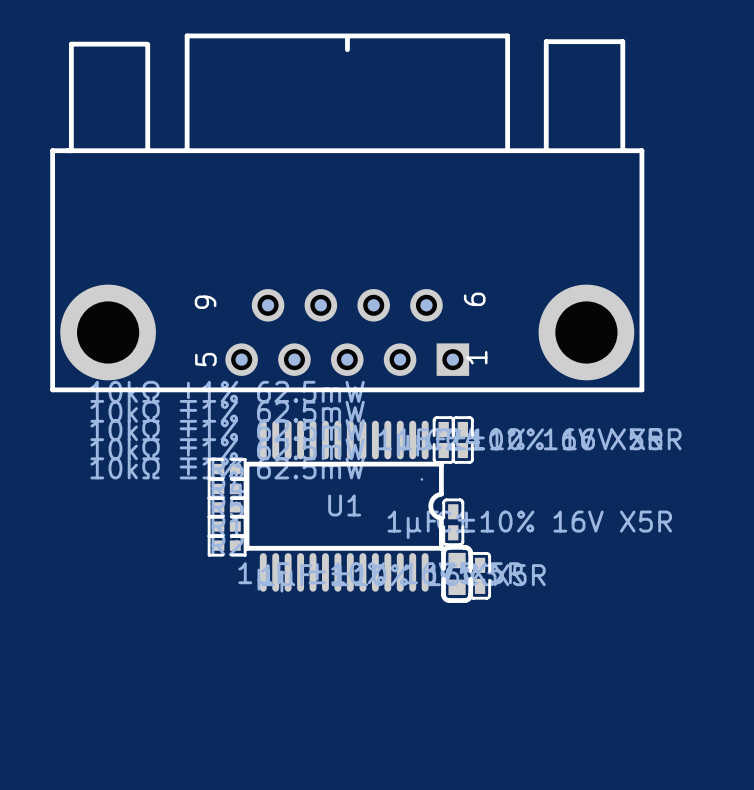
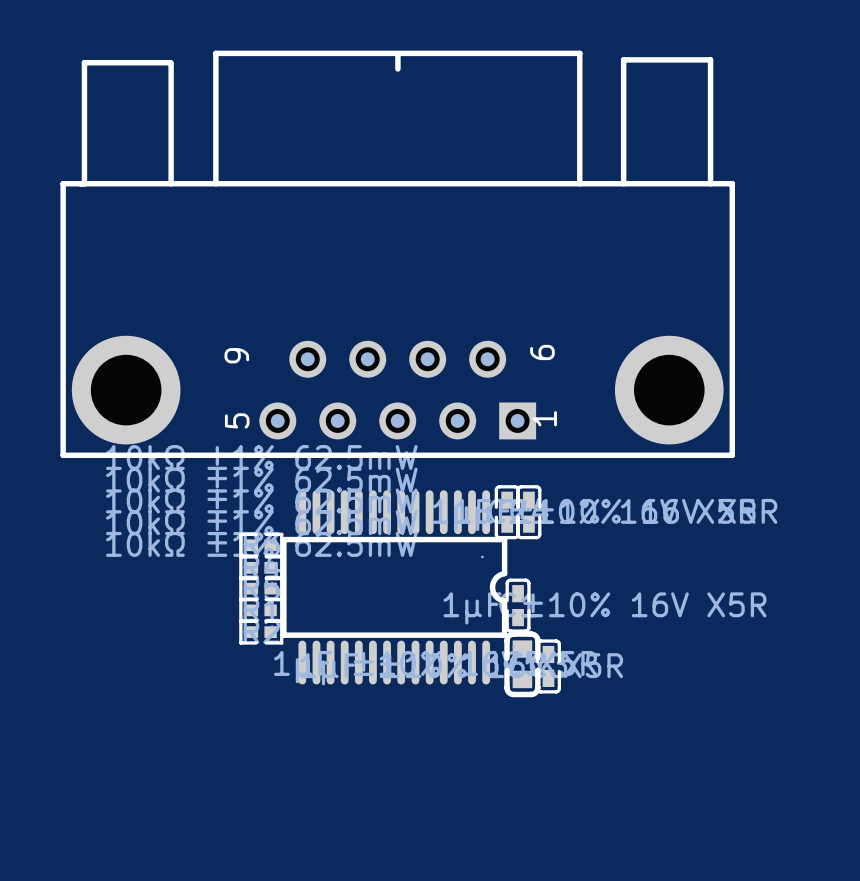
U1 name: U1 (344, 505) -> none

